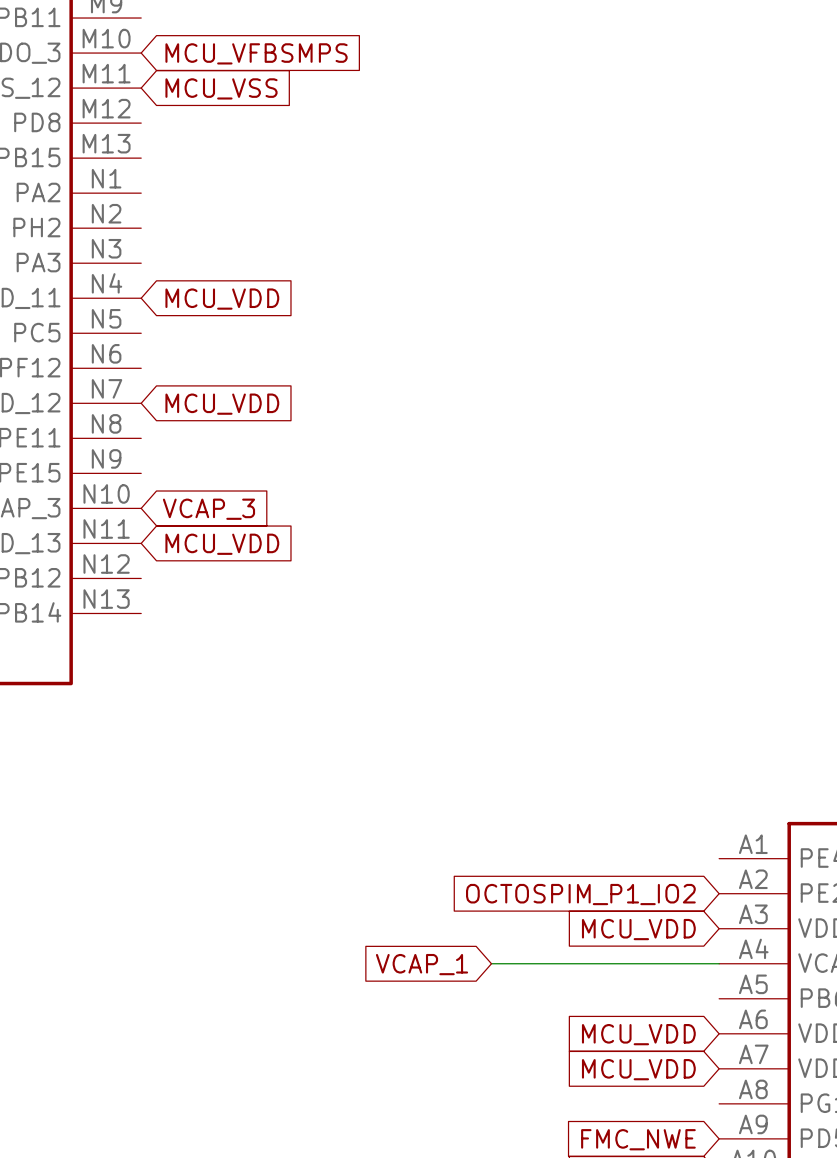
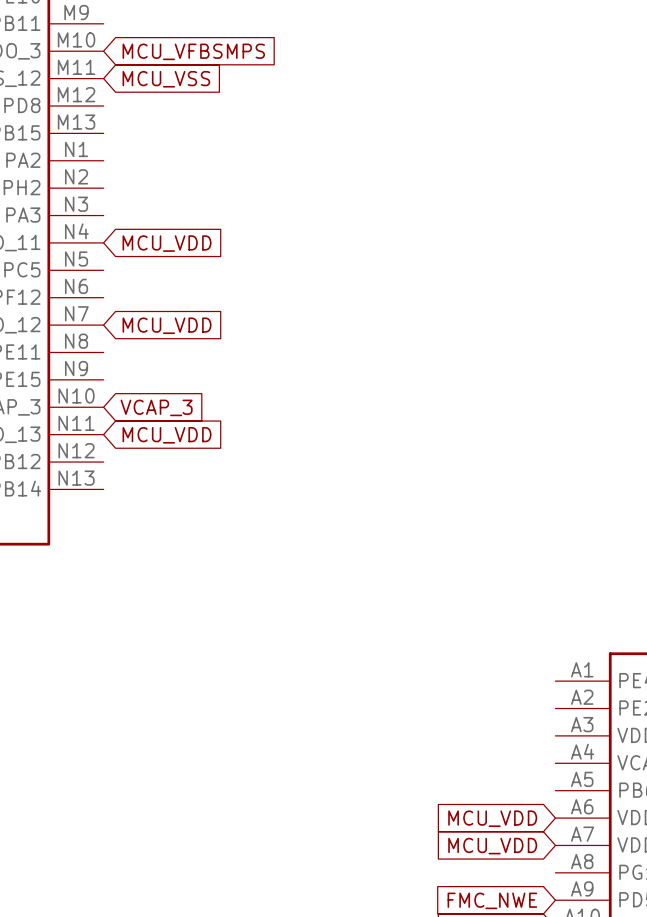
global label: OCTOSPIM_P1_IO2 (580, 894) -> none
global label: MCU_VDD (638, 929) -> none
wire: (491, 963) (719, 963) -> none
global label: VCAP_1 (422, 964) -> none

